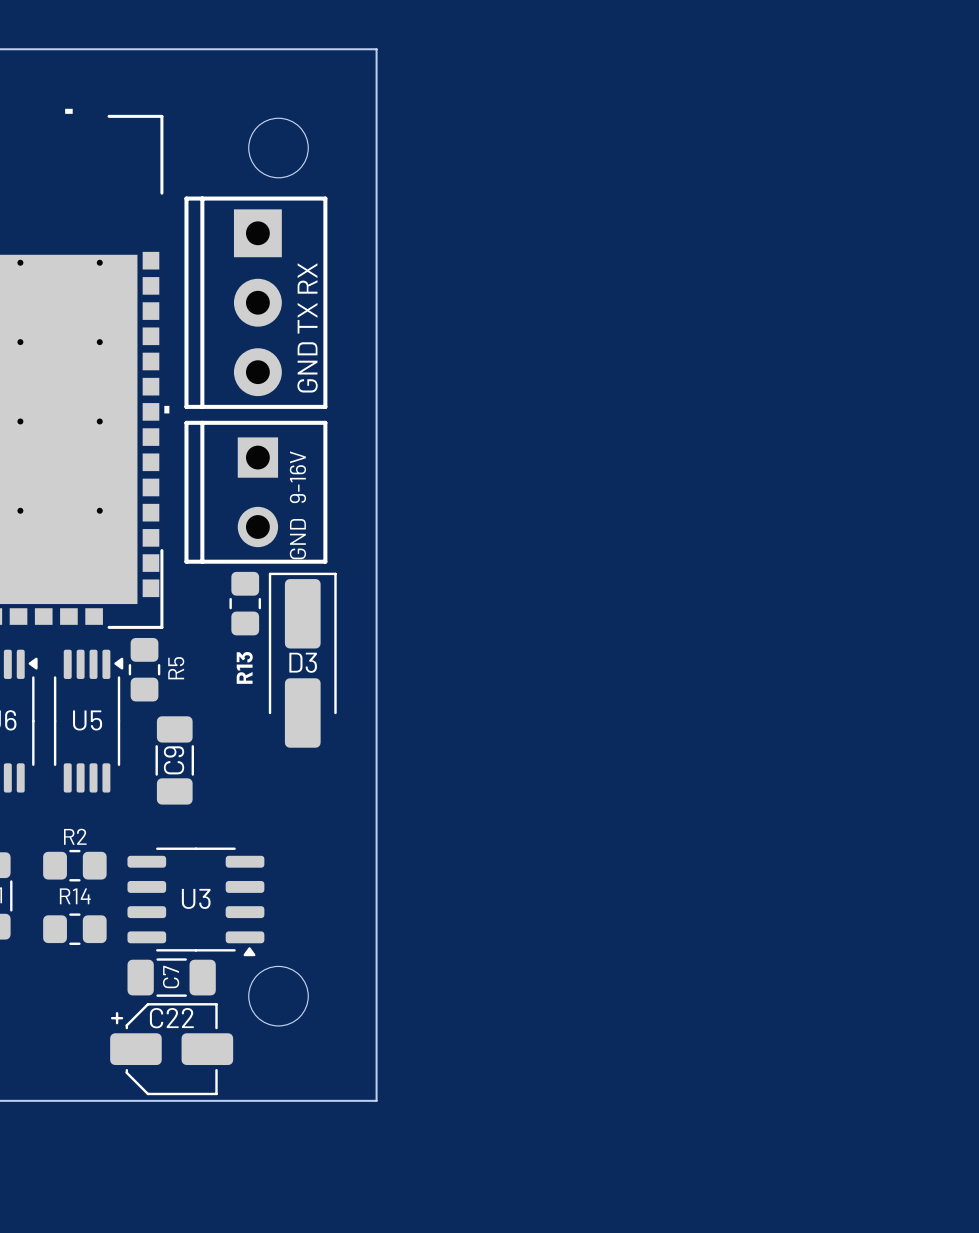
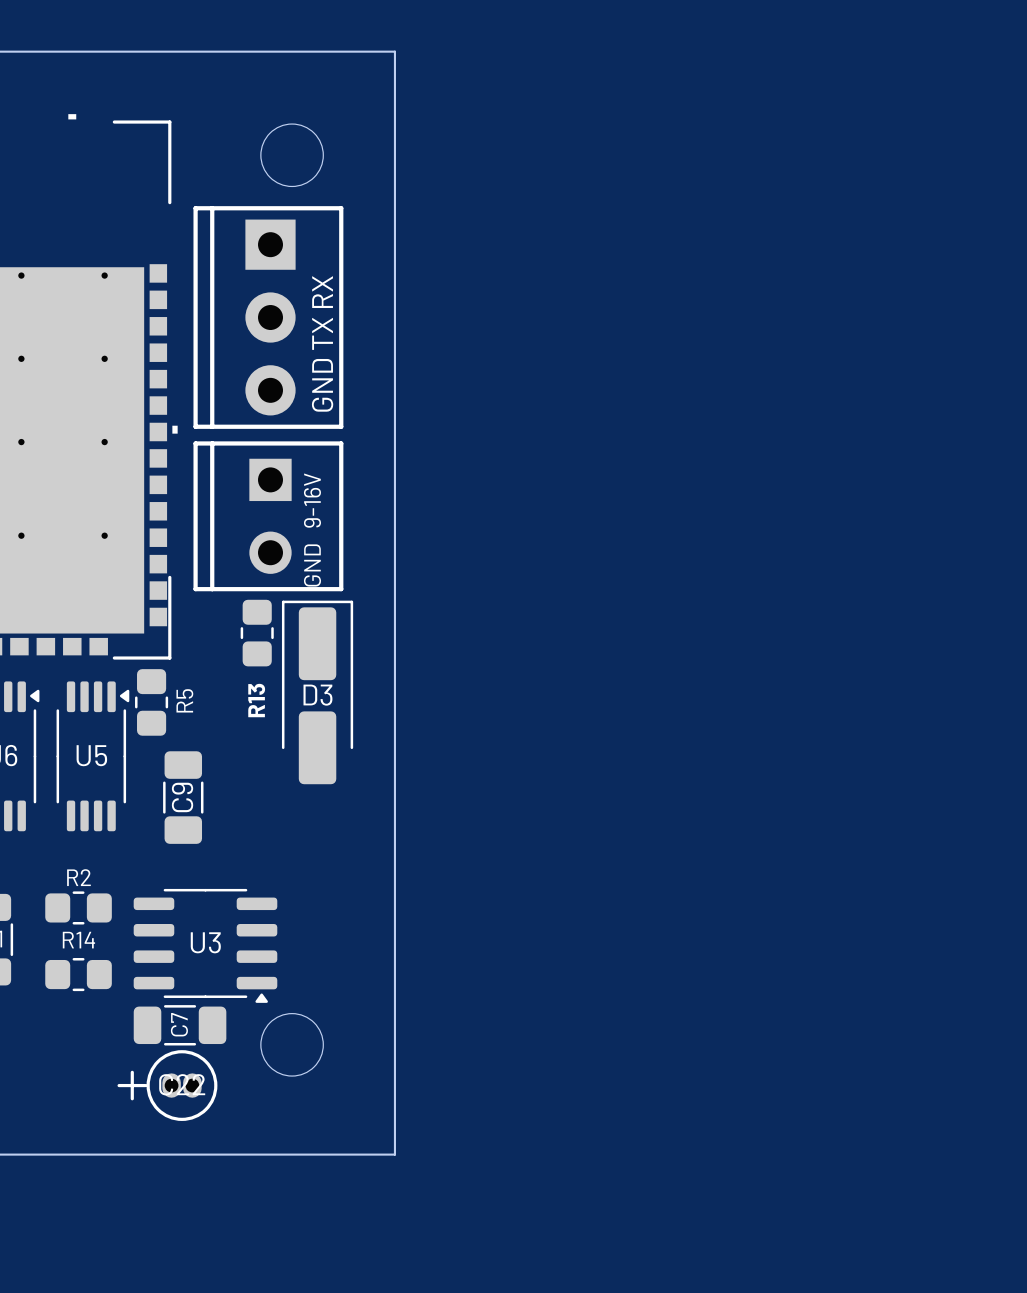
C22 footprint: [110, 1003, 234, 1096] -> [117, 1050, 218, 1121]

